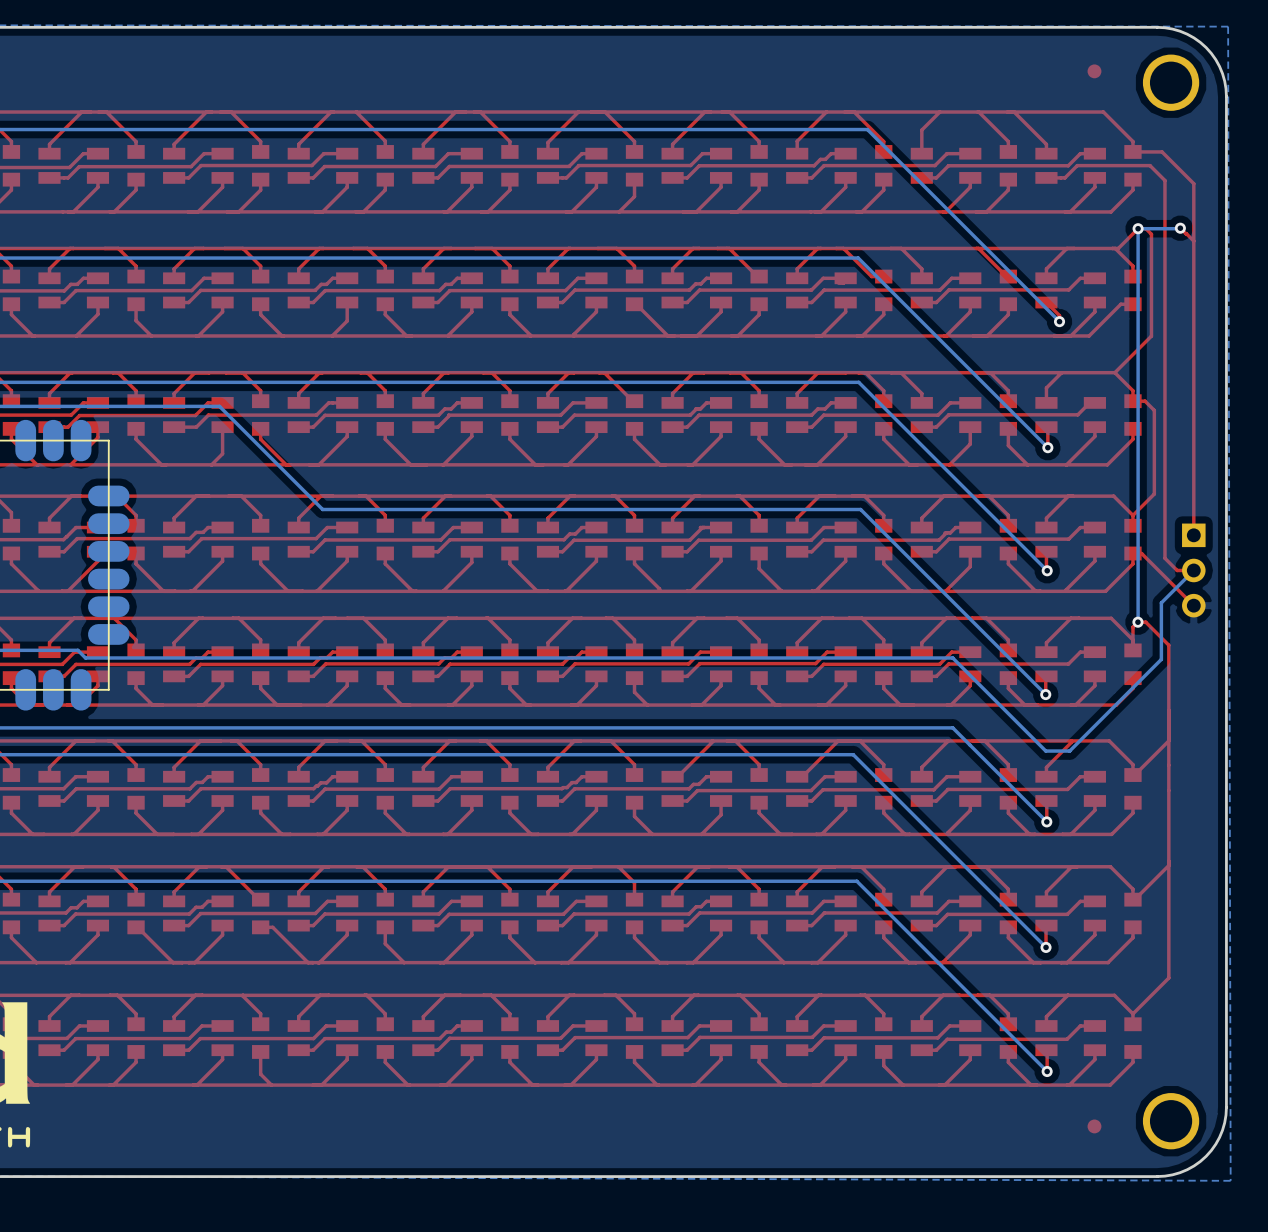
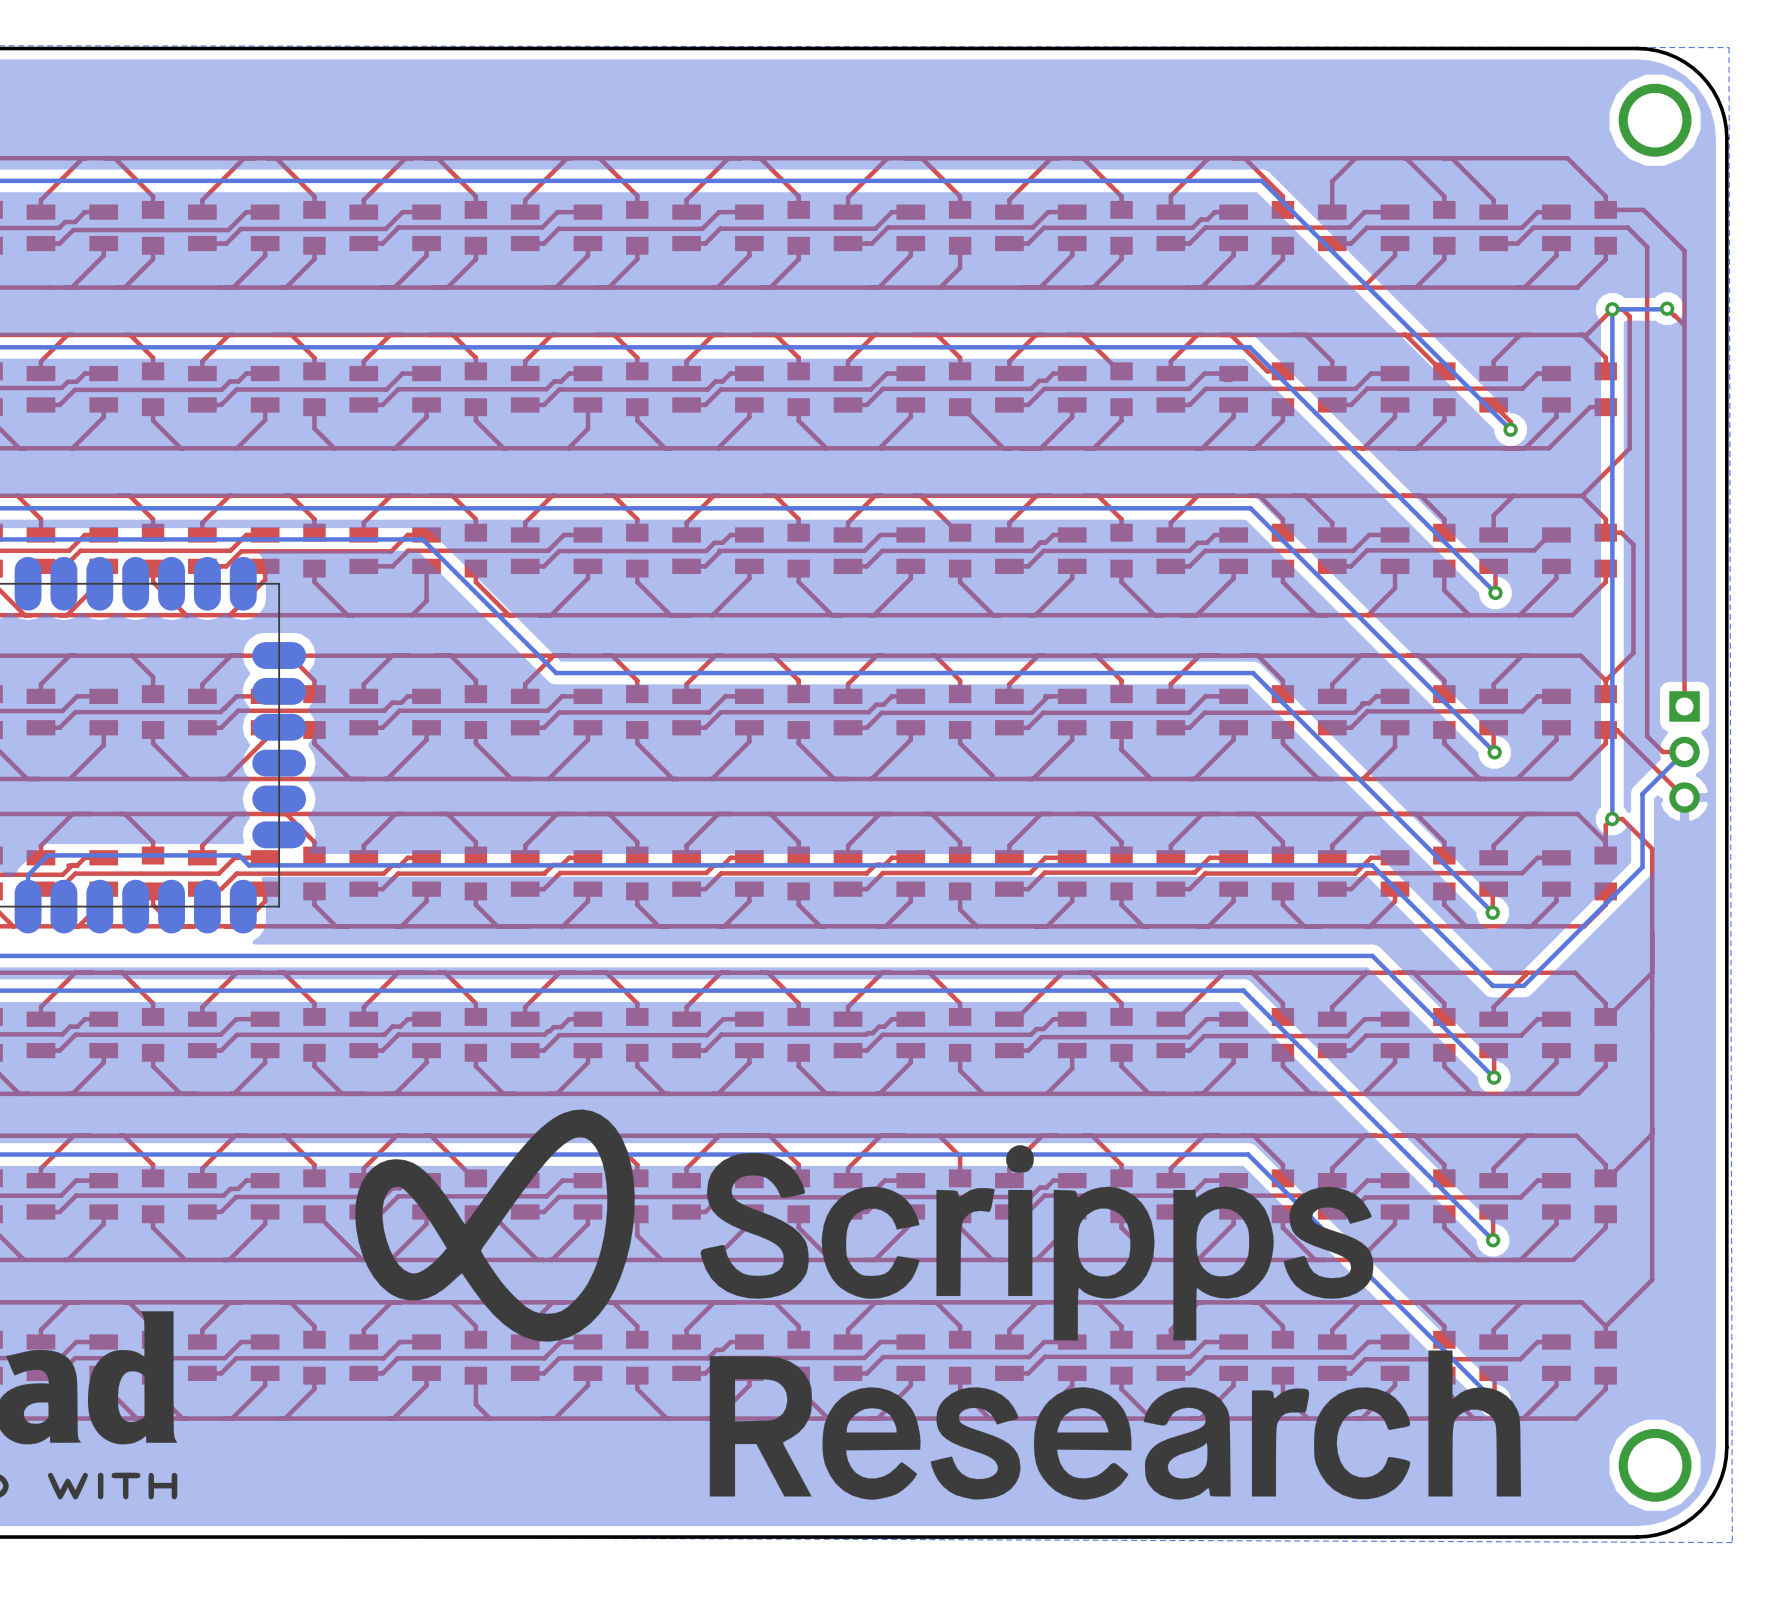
part: (1094, 71) -> none
drawing: none -> [355, 1109, 1522, 1500]
part: (1094, 1126) -> none

